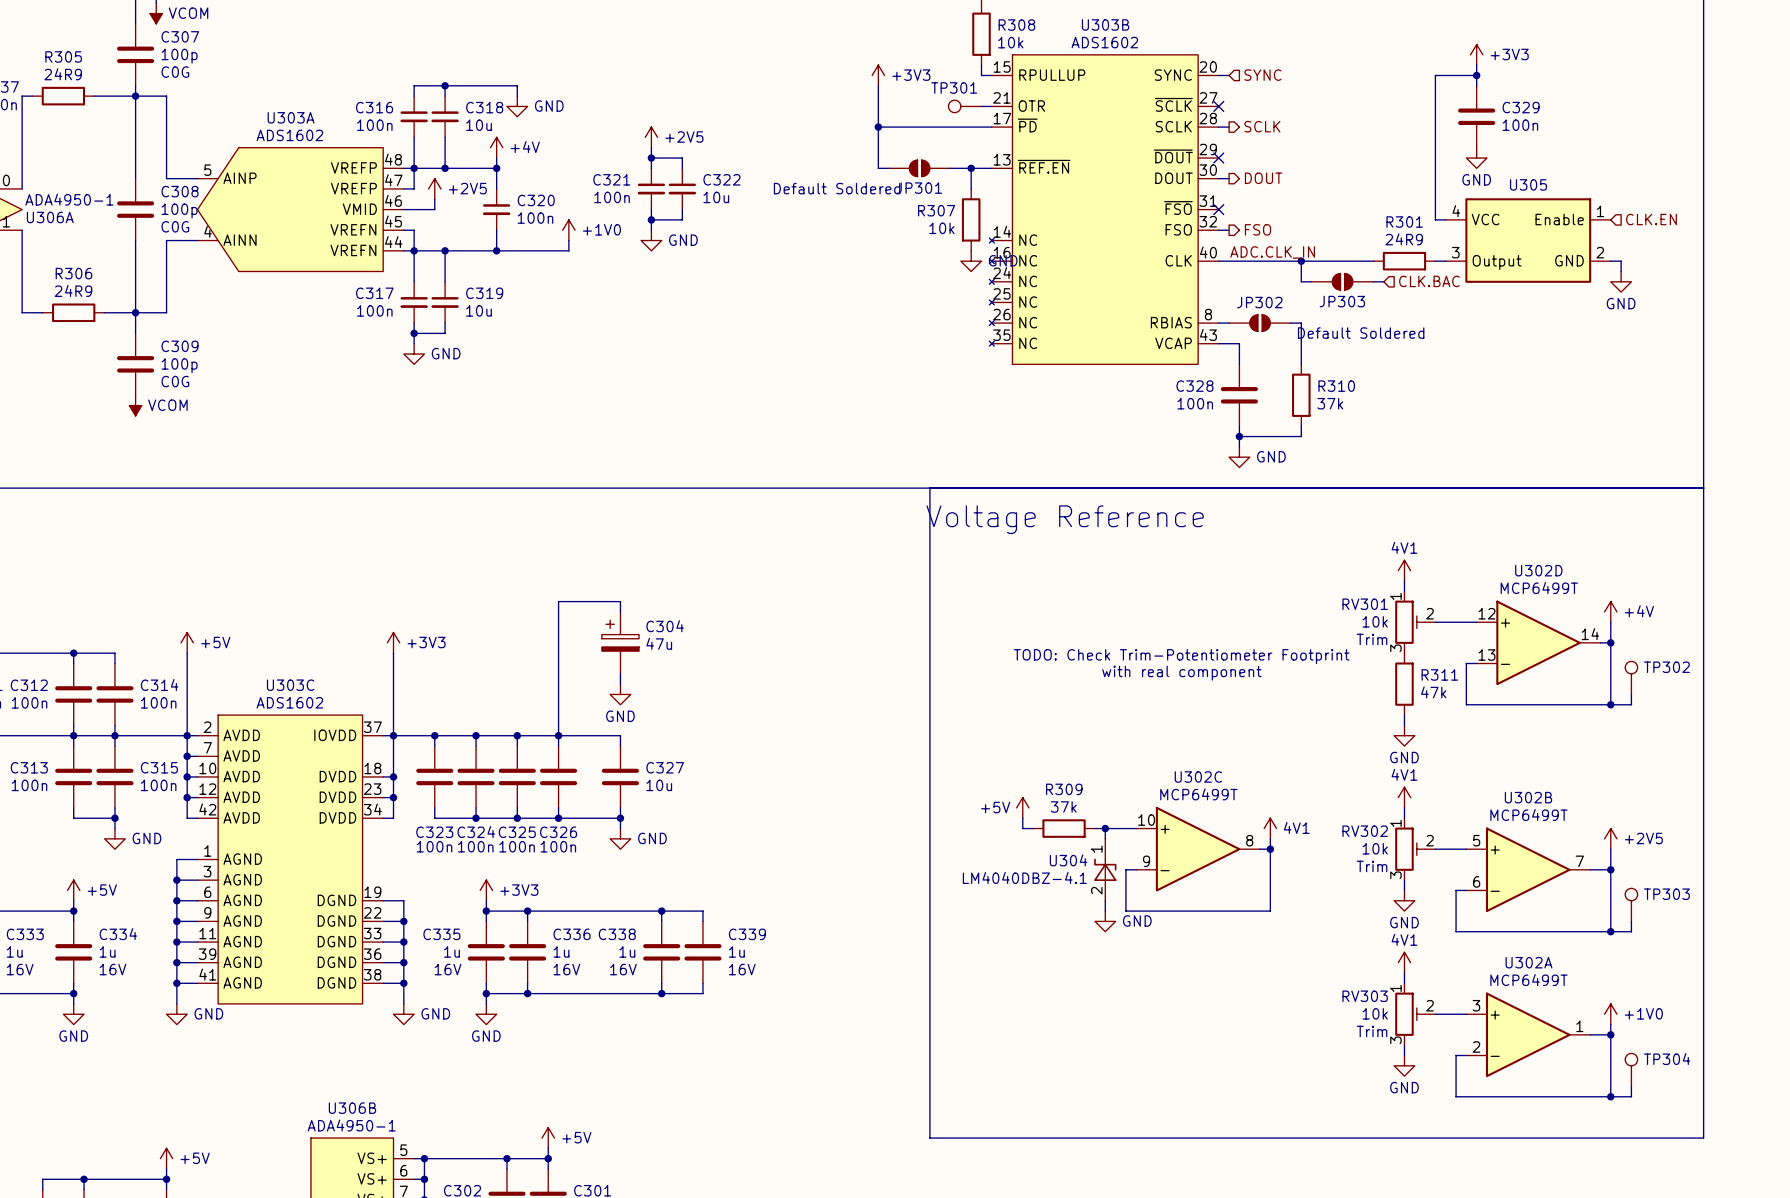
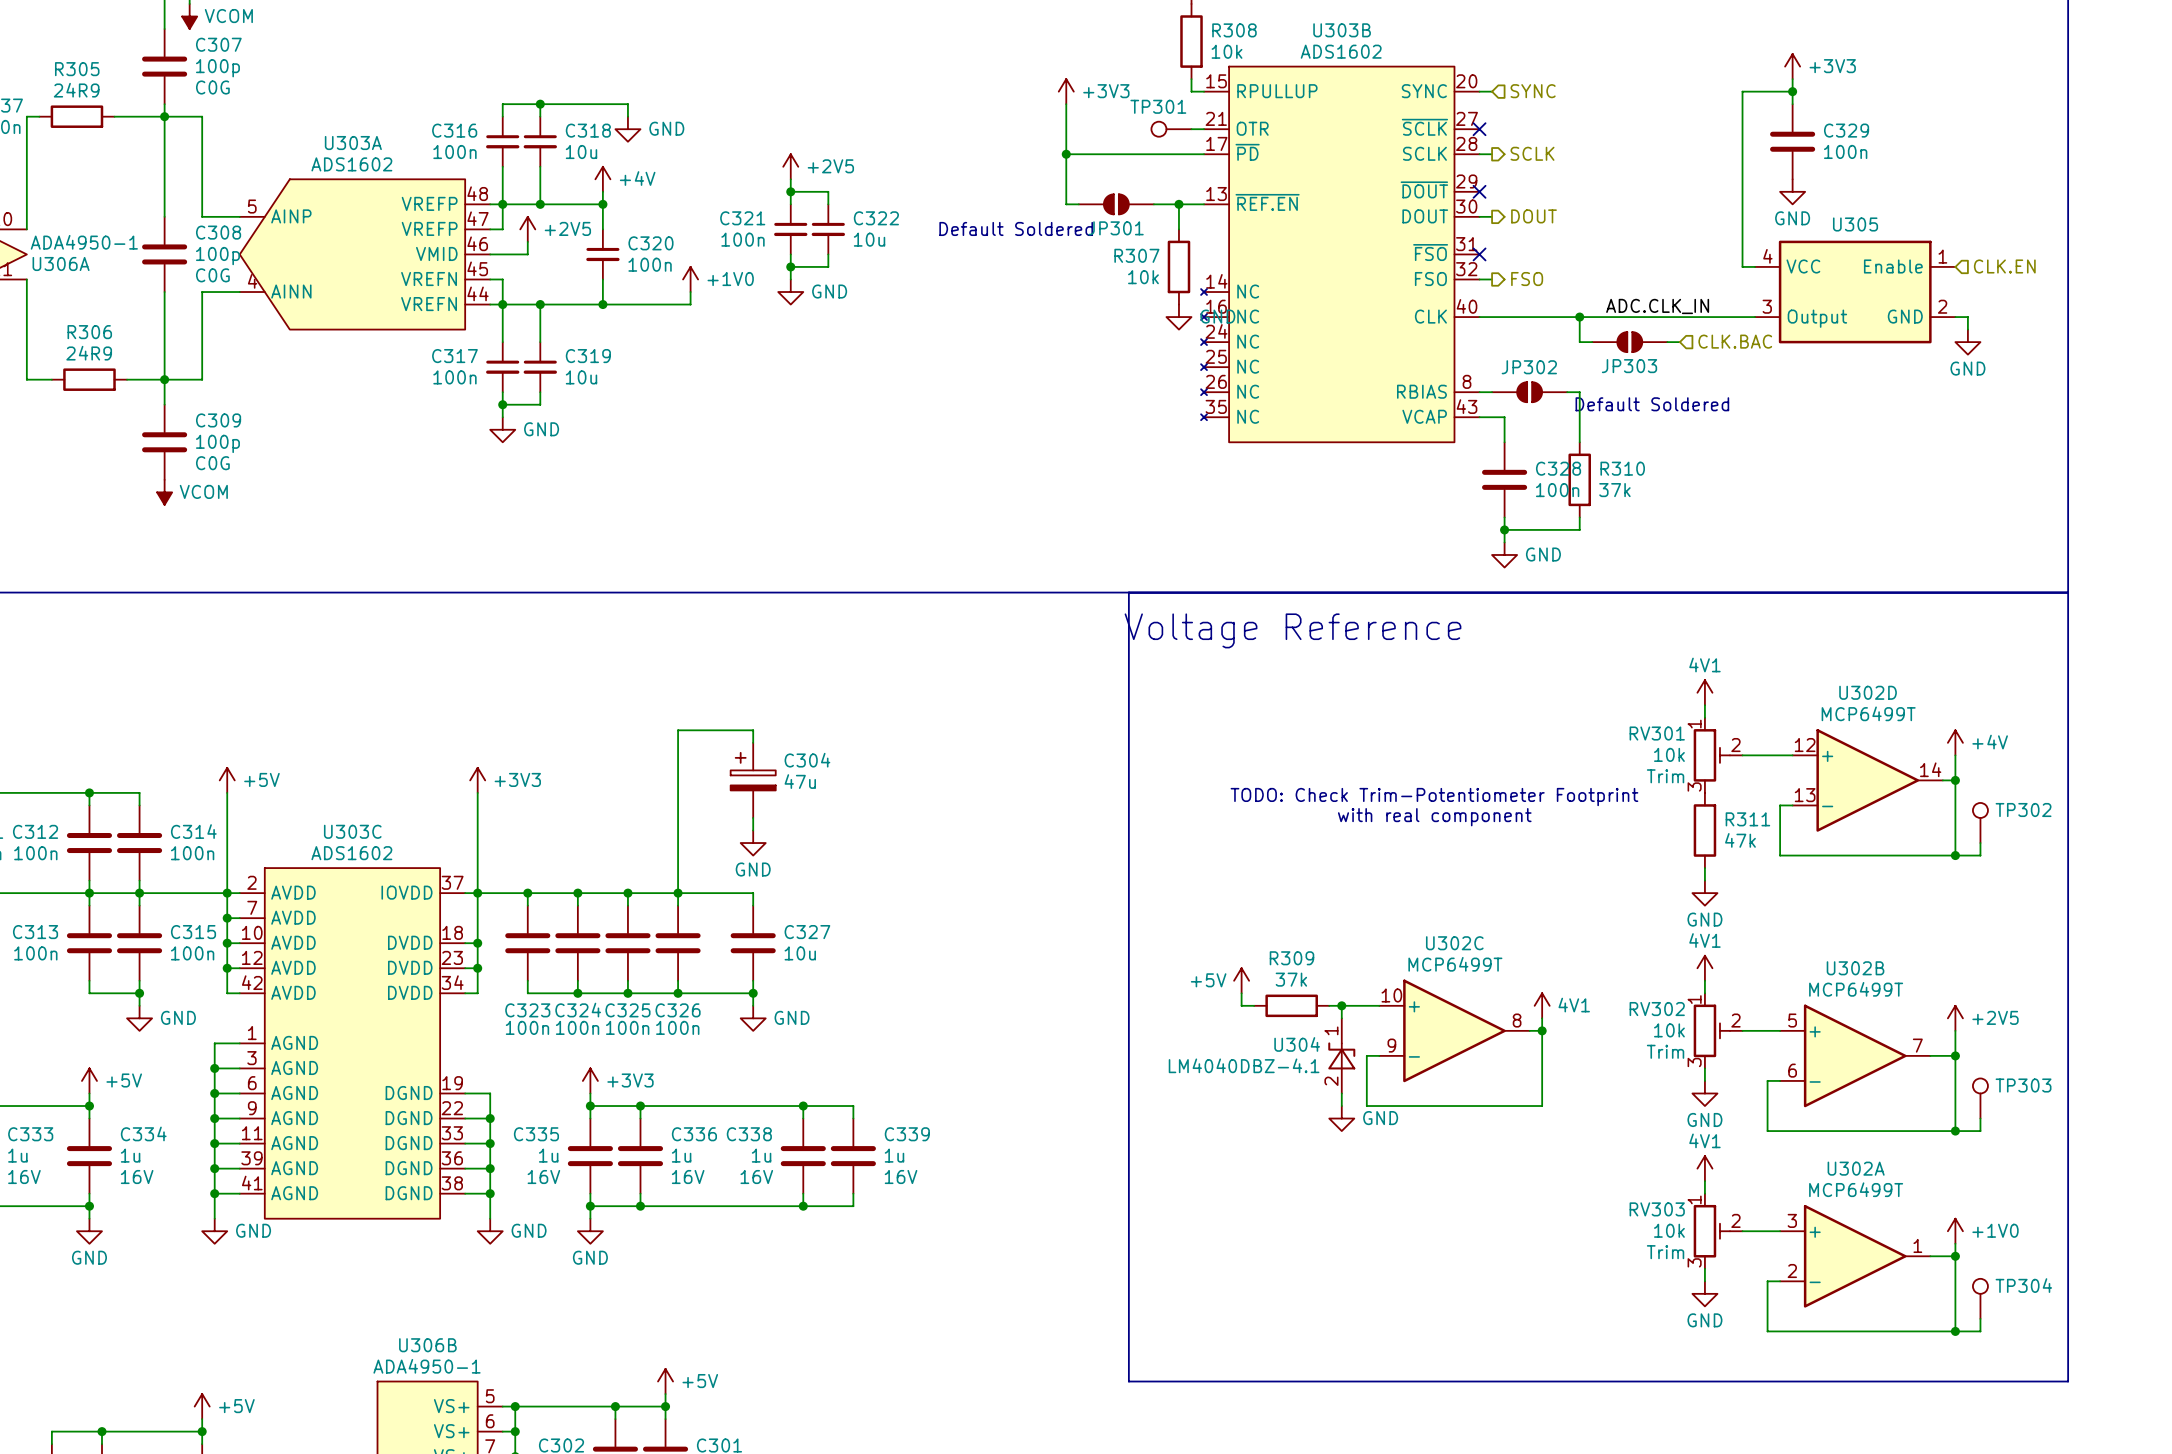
label position: ADC.CLK_IN (1272, 252) -> ADC.CLK_IN (1657, 306)
wire: none -> (1667, 317) (1742, 317)
R301: 24R9 (1404, 261) -> none
C328 name position: C328 (1194, 386) -> C328 (1558, 468)
C328 value position: 100n (1195, 403) -> 100n (1557, 490)

